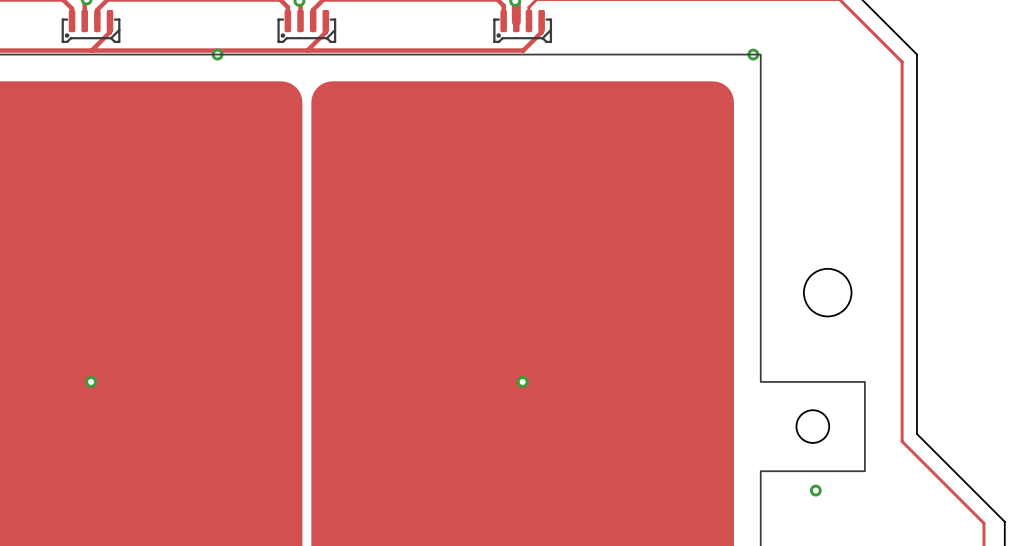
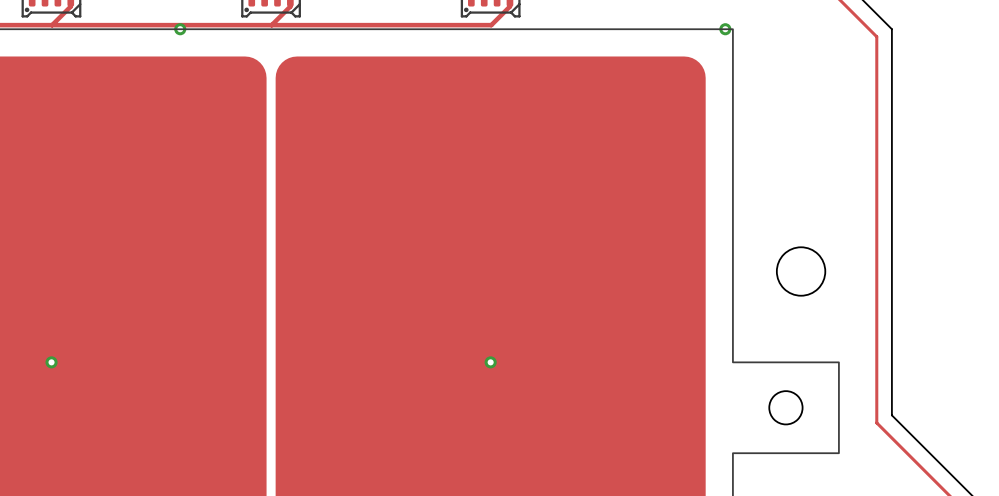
via: (815, 490) -> none

